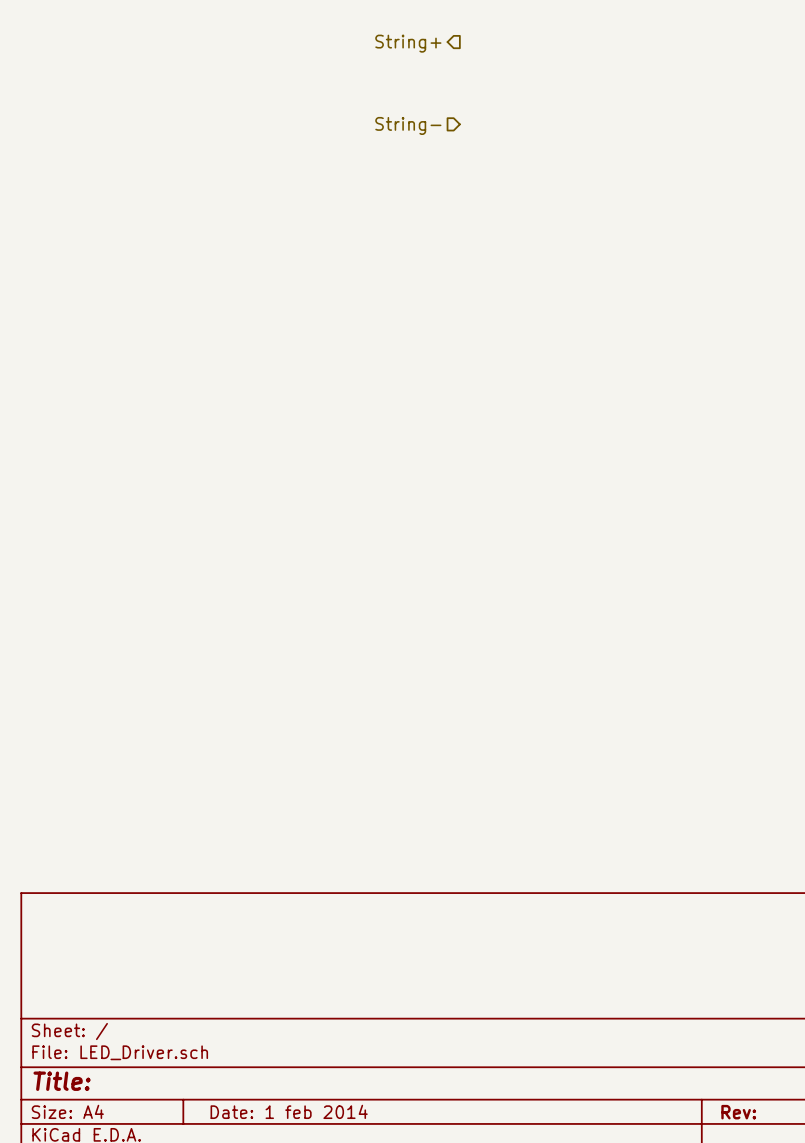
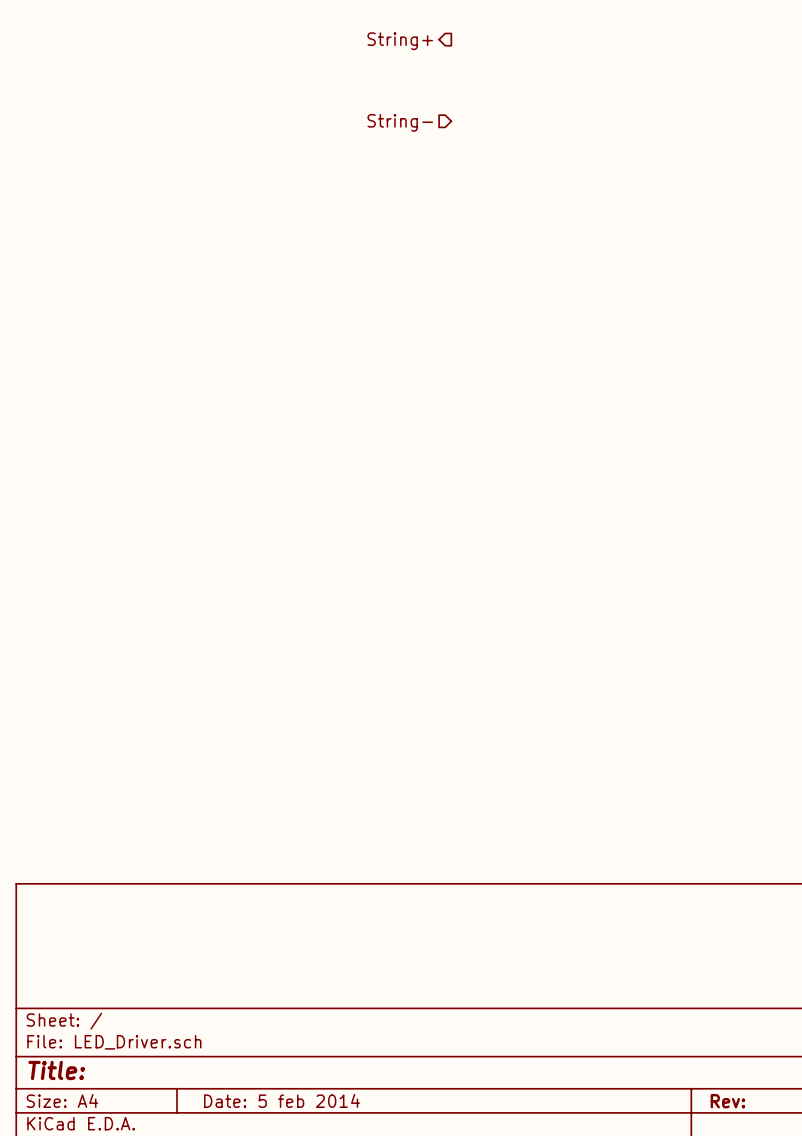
title block: Date: 1 feb 2014 (289, 1111) -> Date: 5 feb 2014 (281, 1100)

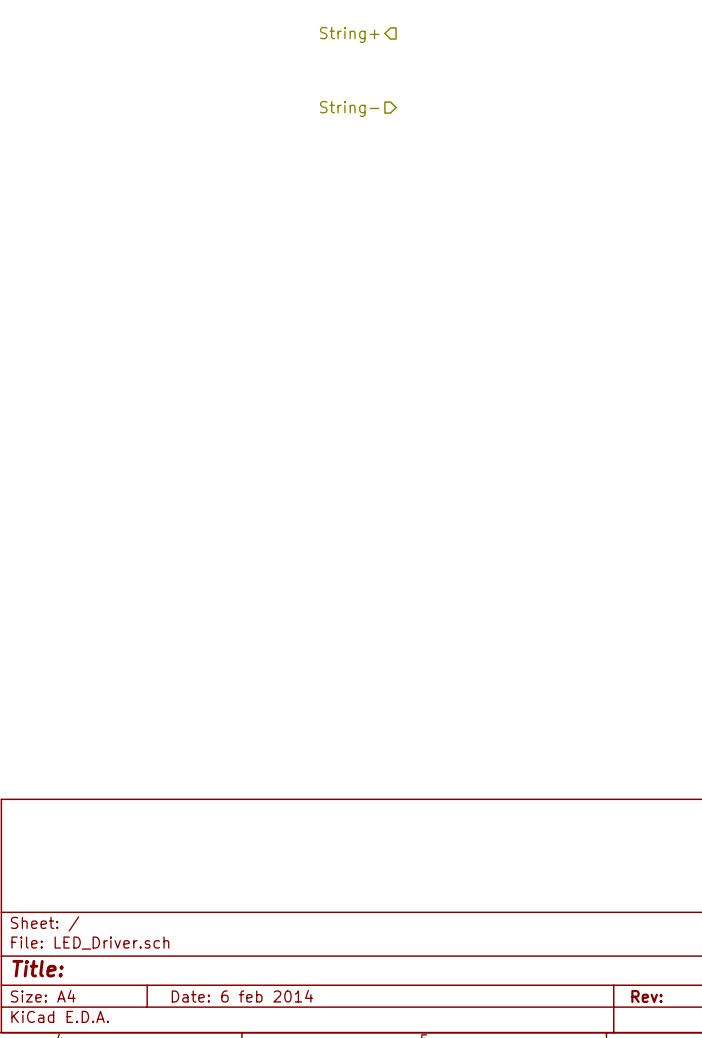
title block: Date: 5 feb 2014 (281, 1100) -> Date: 6 feb 2014 (242, 996)

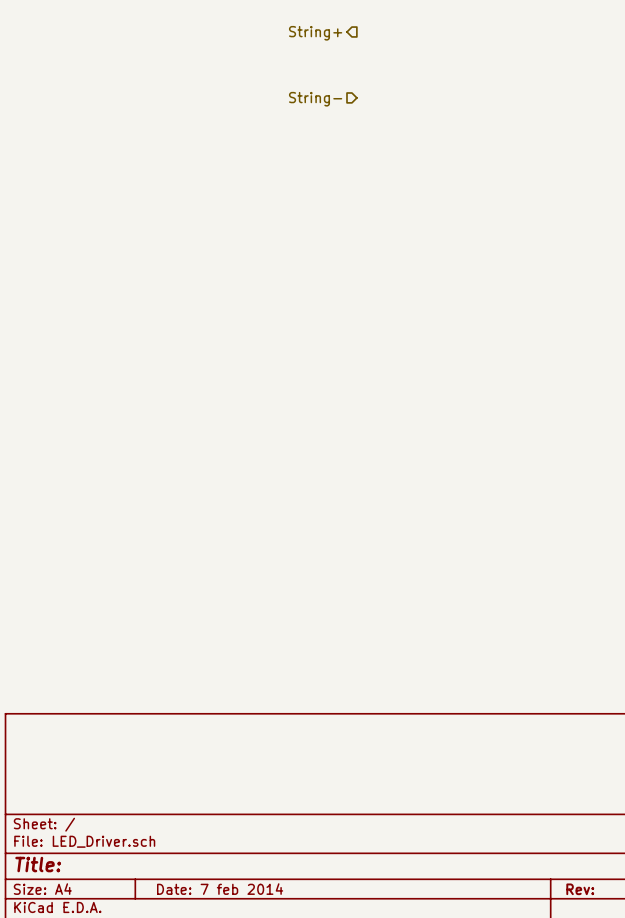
title block: Date: 6 feb 2014 (242, 996) -> Date: 7 feb 2014 (220, 889)

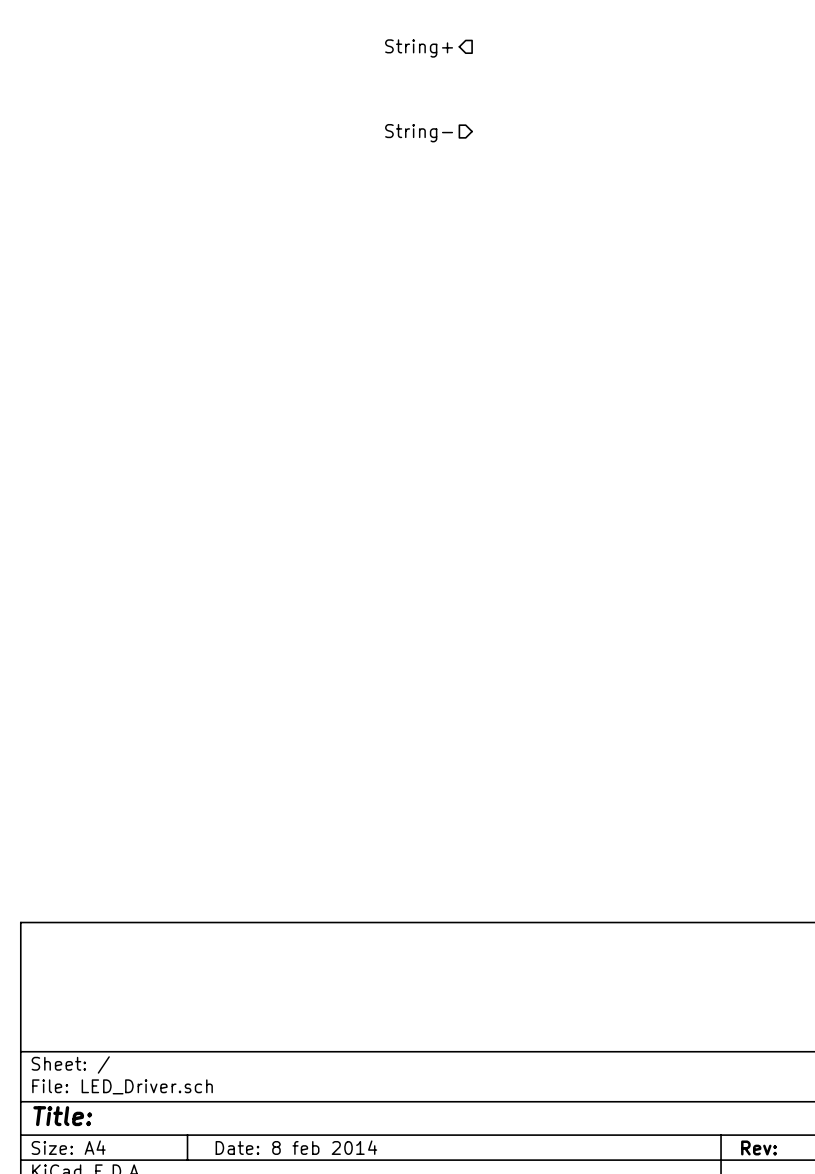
title block: Date: 7 feb 2014 (220, 889) -> Date: 8 feb 2014 (296, 1147)

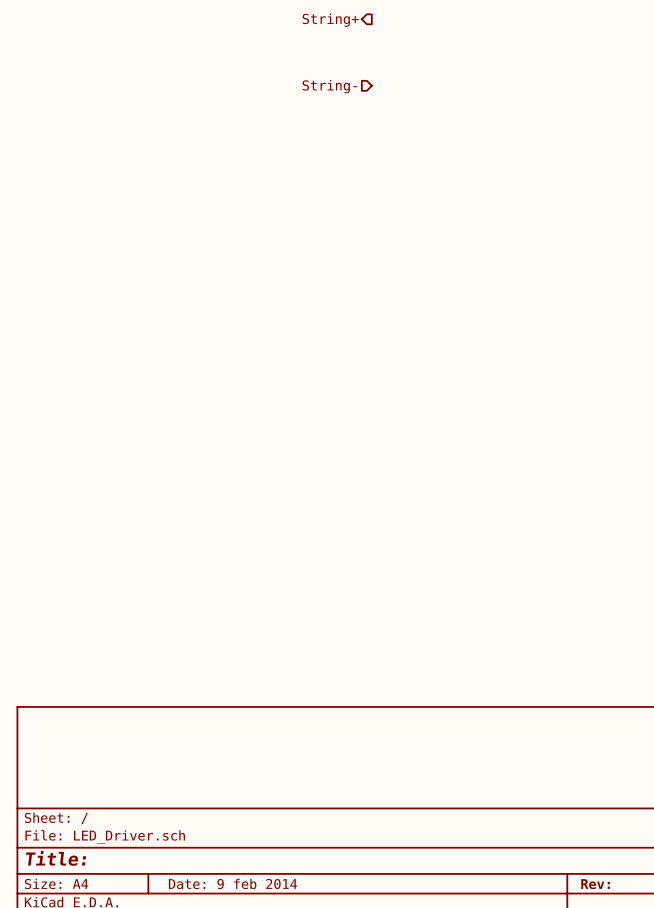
title block: Date: 8 feb 2014 (296, 1147) -> Date: 9 feb 2014 (232, 883)

